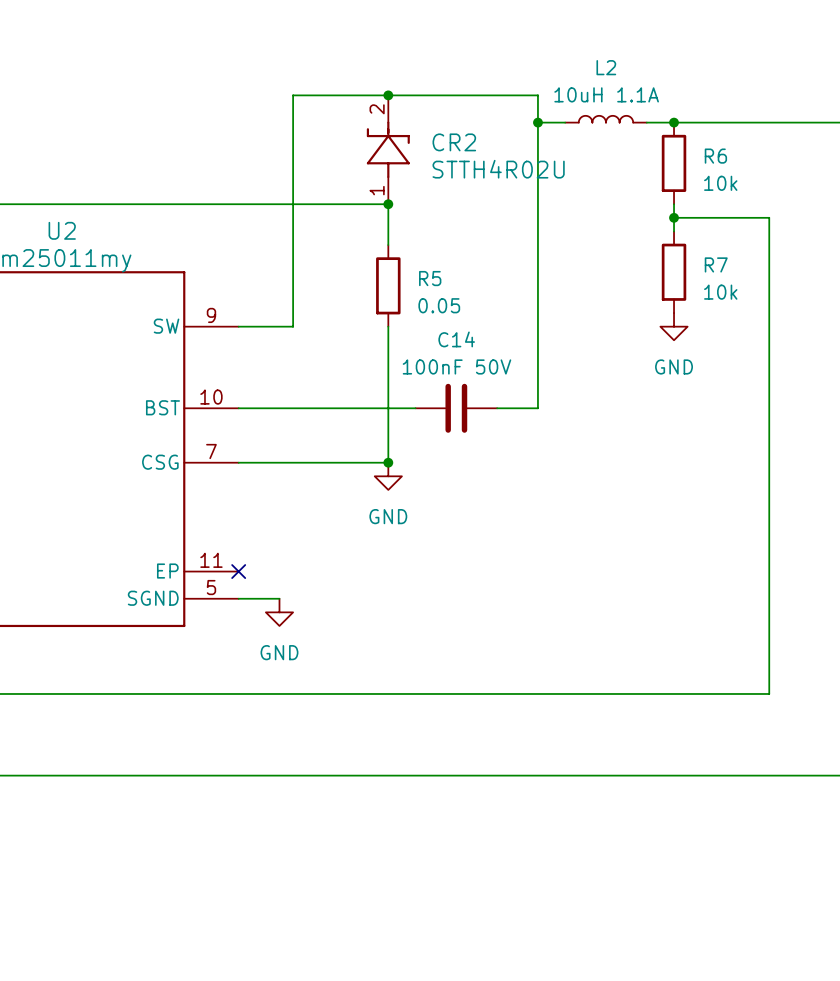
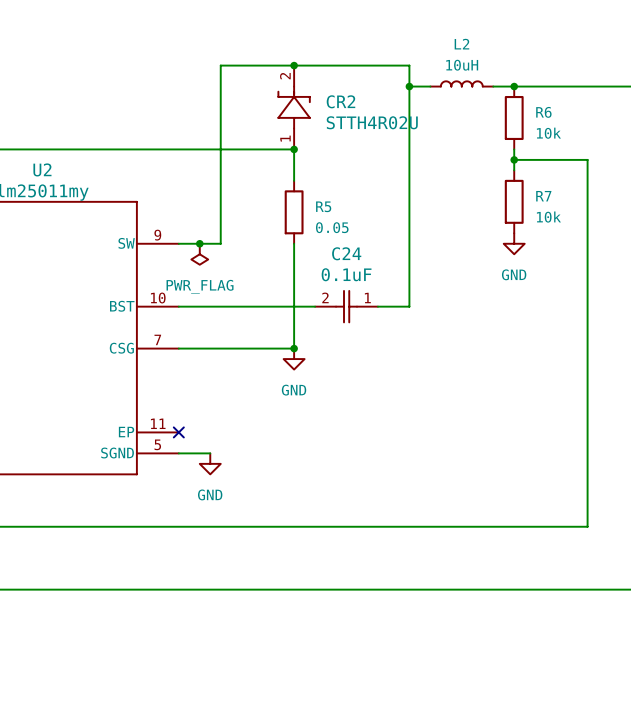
L2 value: 10uH 1.1A (606, 94) -> 10uH (462, 65)
junction: none -> (199, 243)
power symbol: none -> PWR_FLAG (199, 254)
C14: 100nF 50V (456, 408) -> none
C24: none -> 0.1uF (346, 306)

